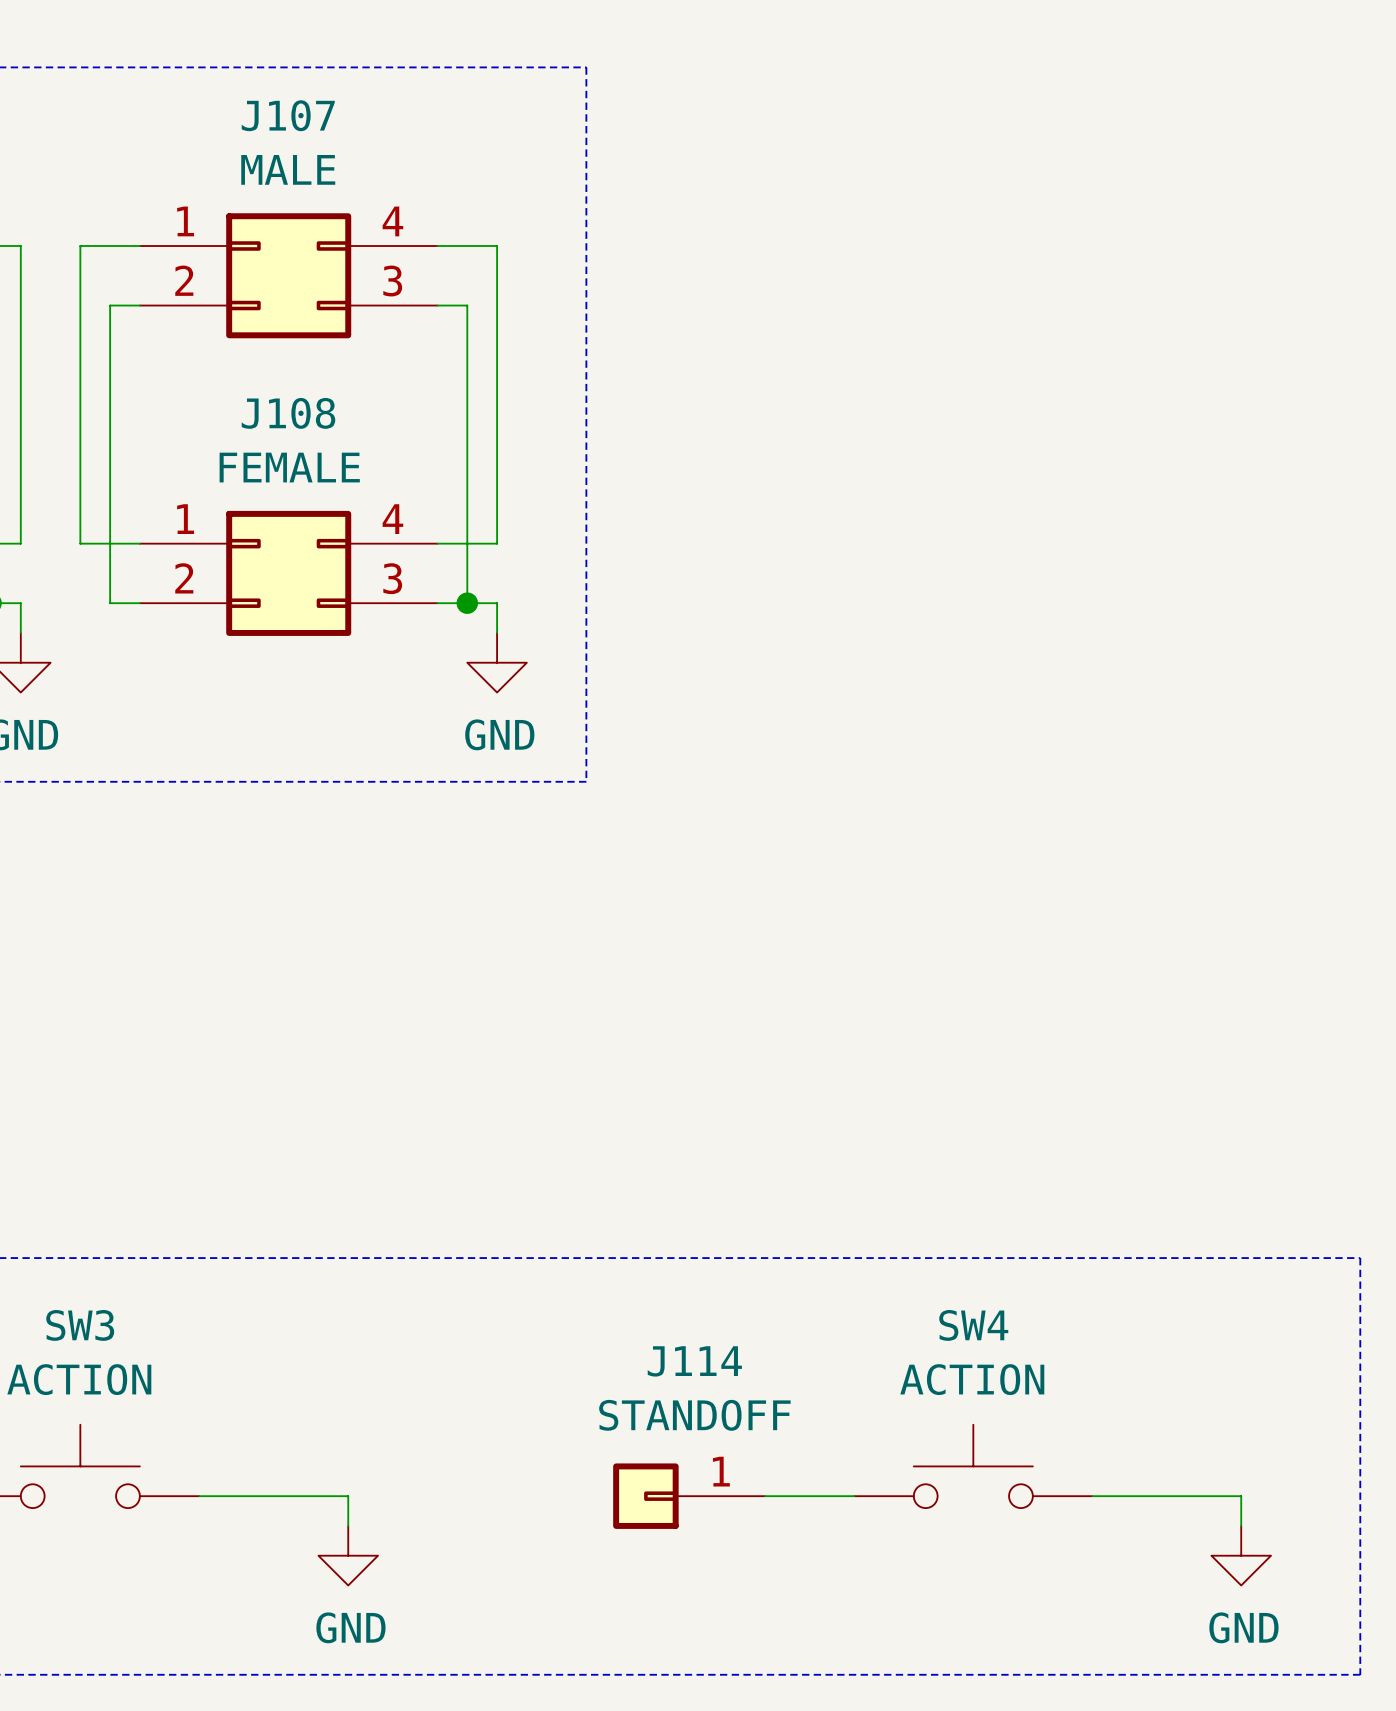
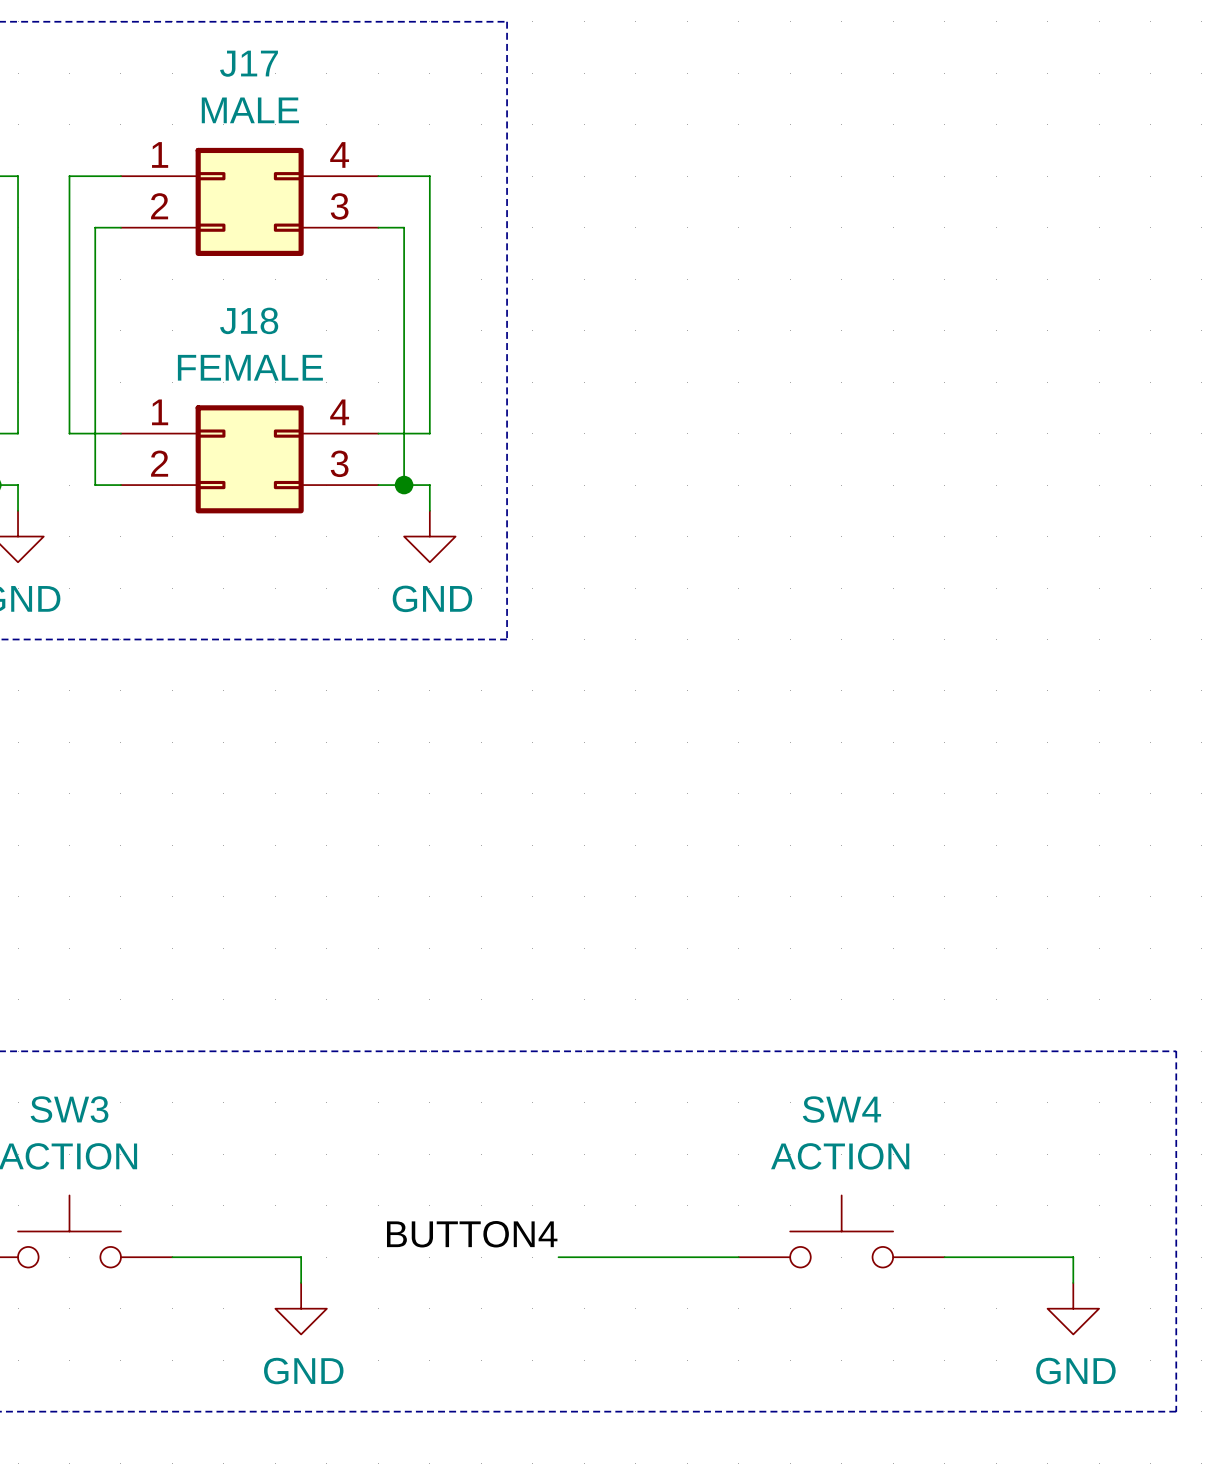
J107 name: J107 (288, 115) -> J17 (249, 63)
J108 name: J108 (288, 413) -> J18 (249, 320)
label: none -> BUTTON4 (472, 1234)
J114: STANDOFF (689, 1496) -> none

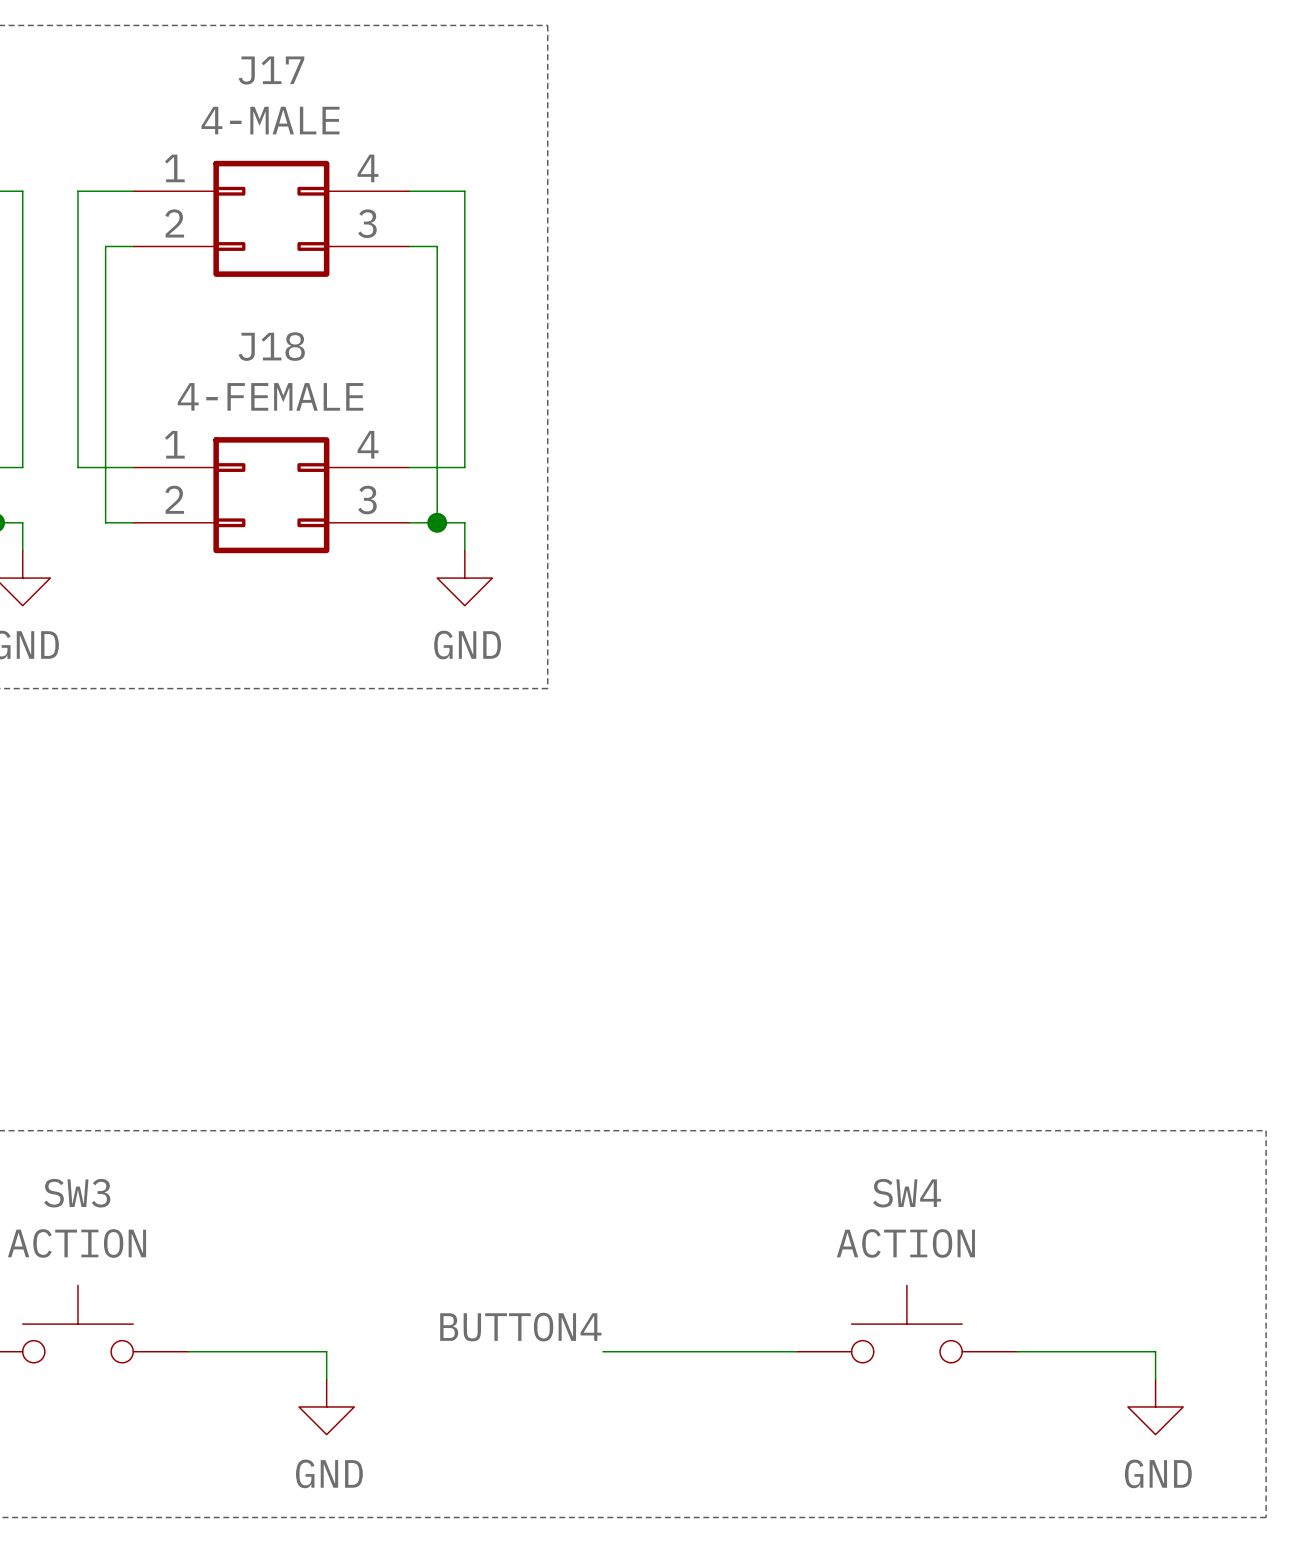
J17 value: MALE (250, 110) -> 4-MALE (270, 120)
J18 value: FEMALE (250, 367) -> 4-FEMALE (270, 396)

